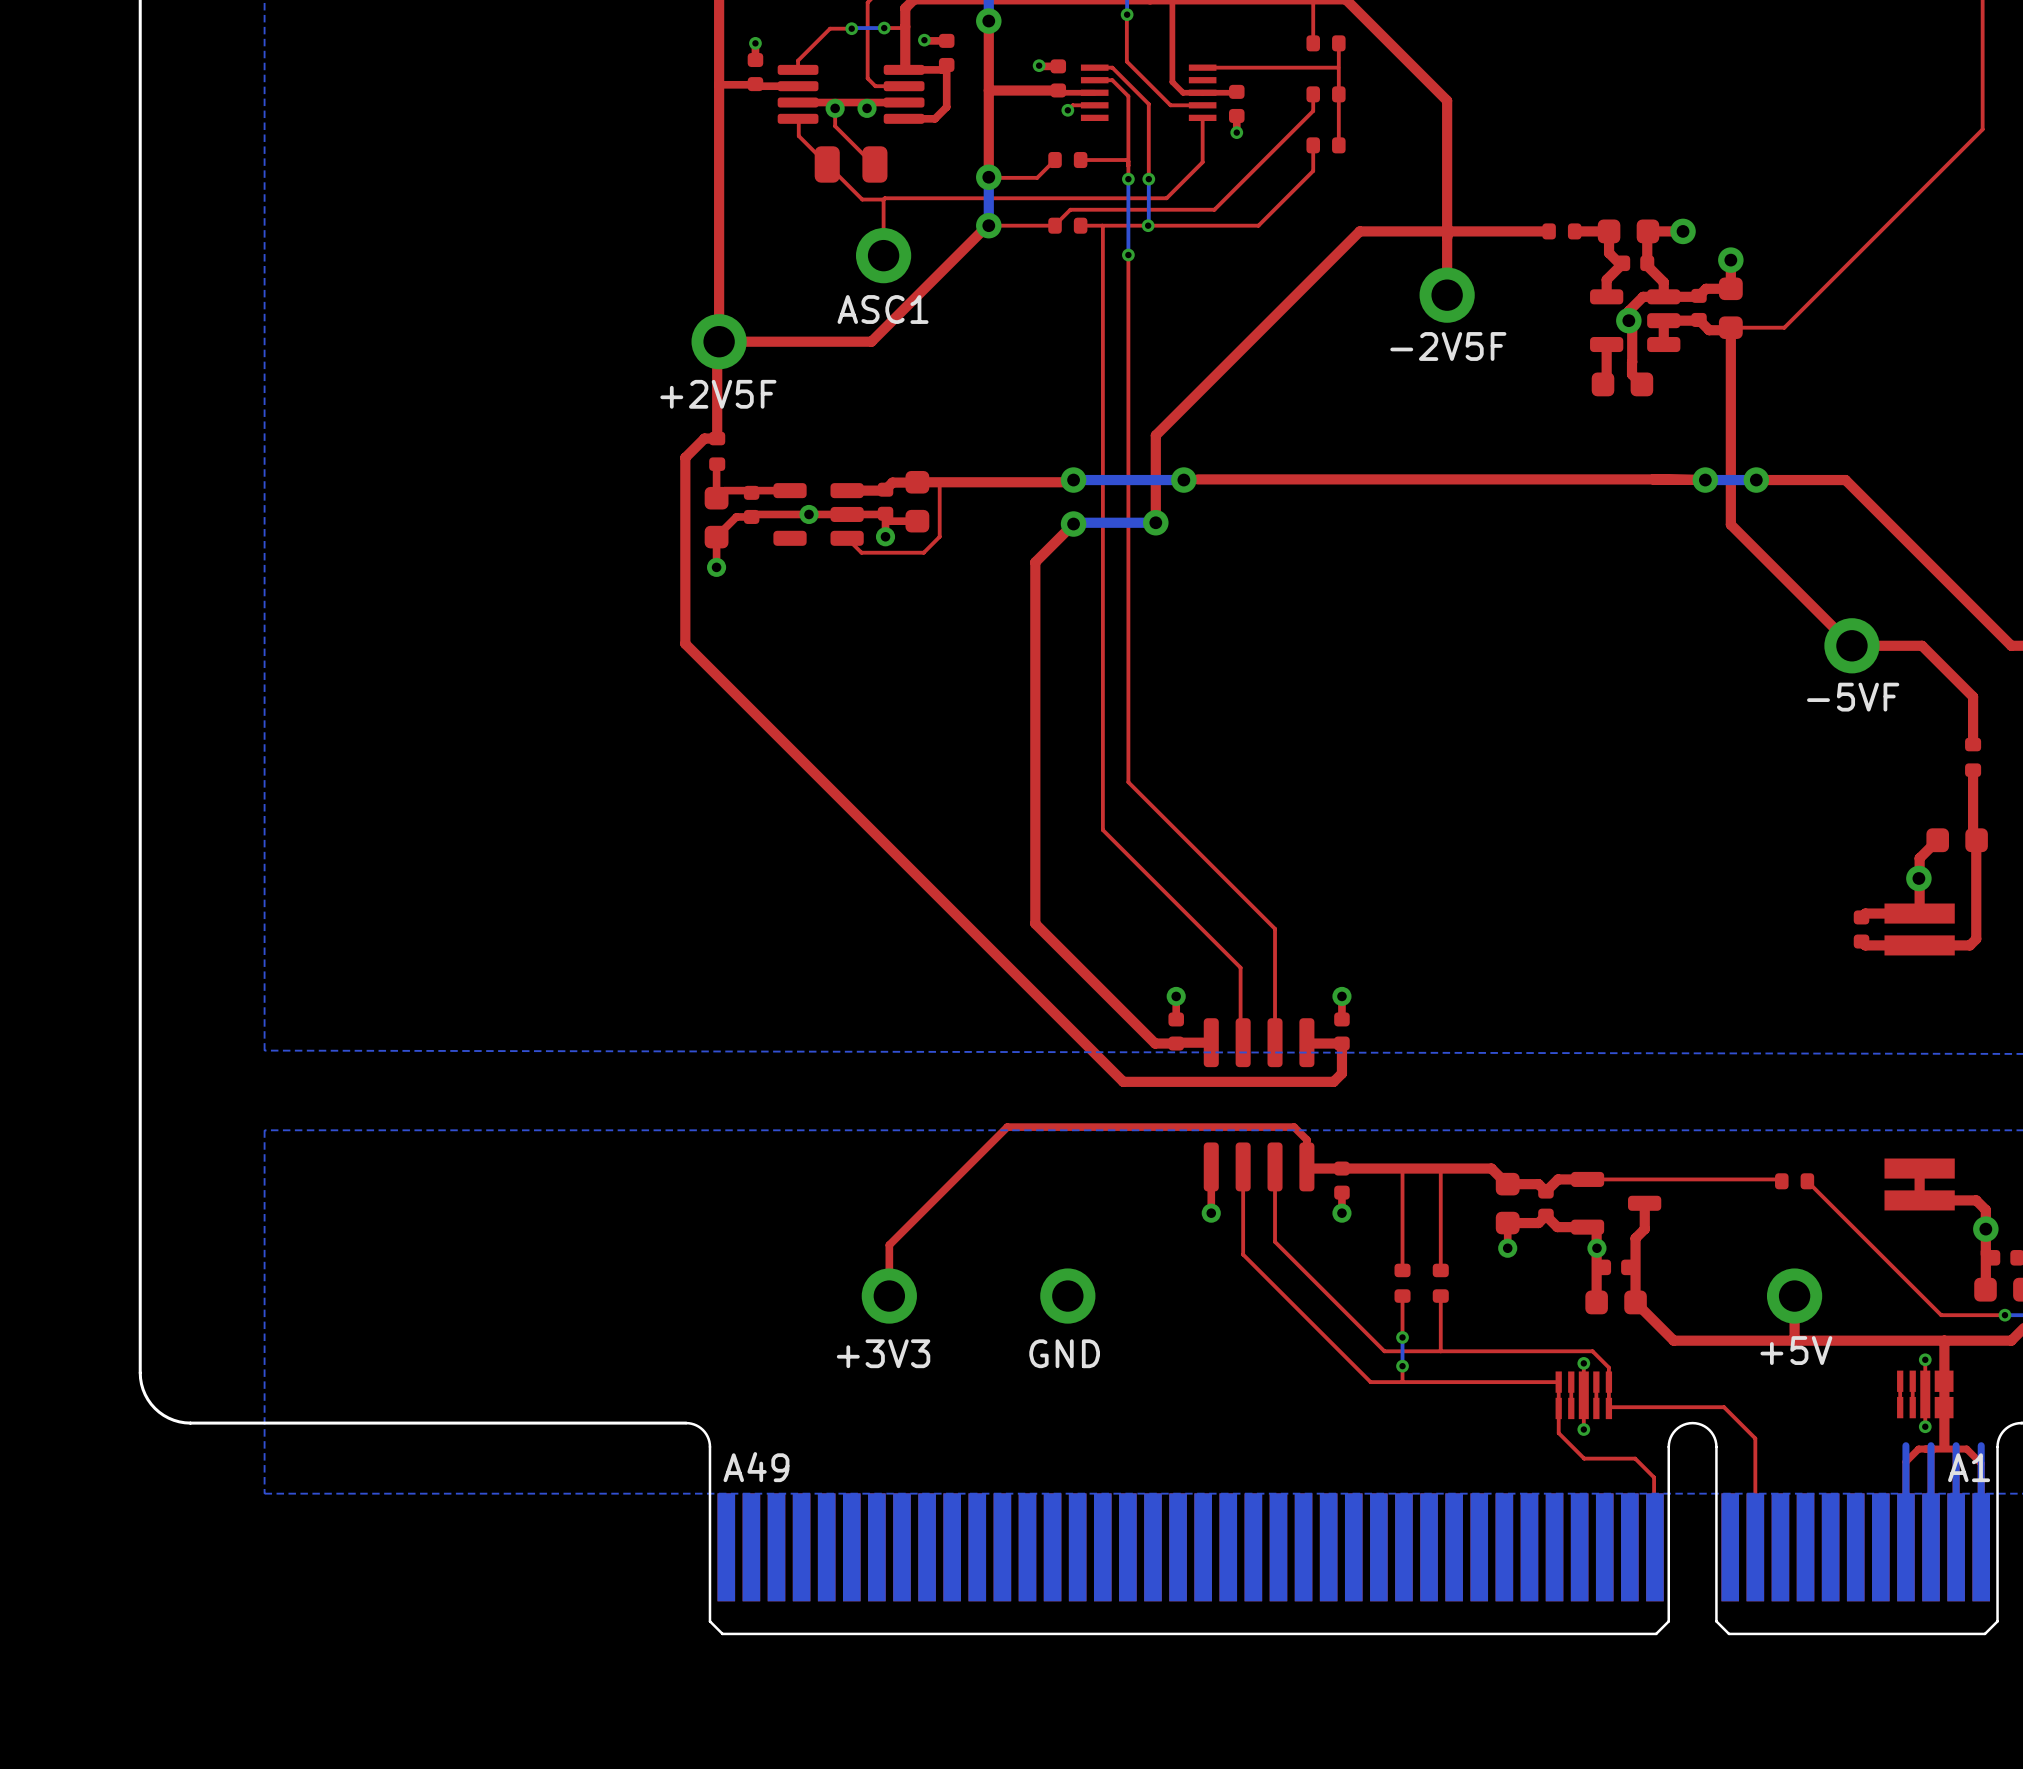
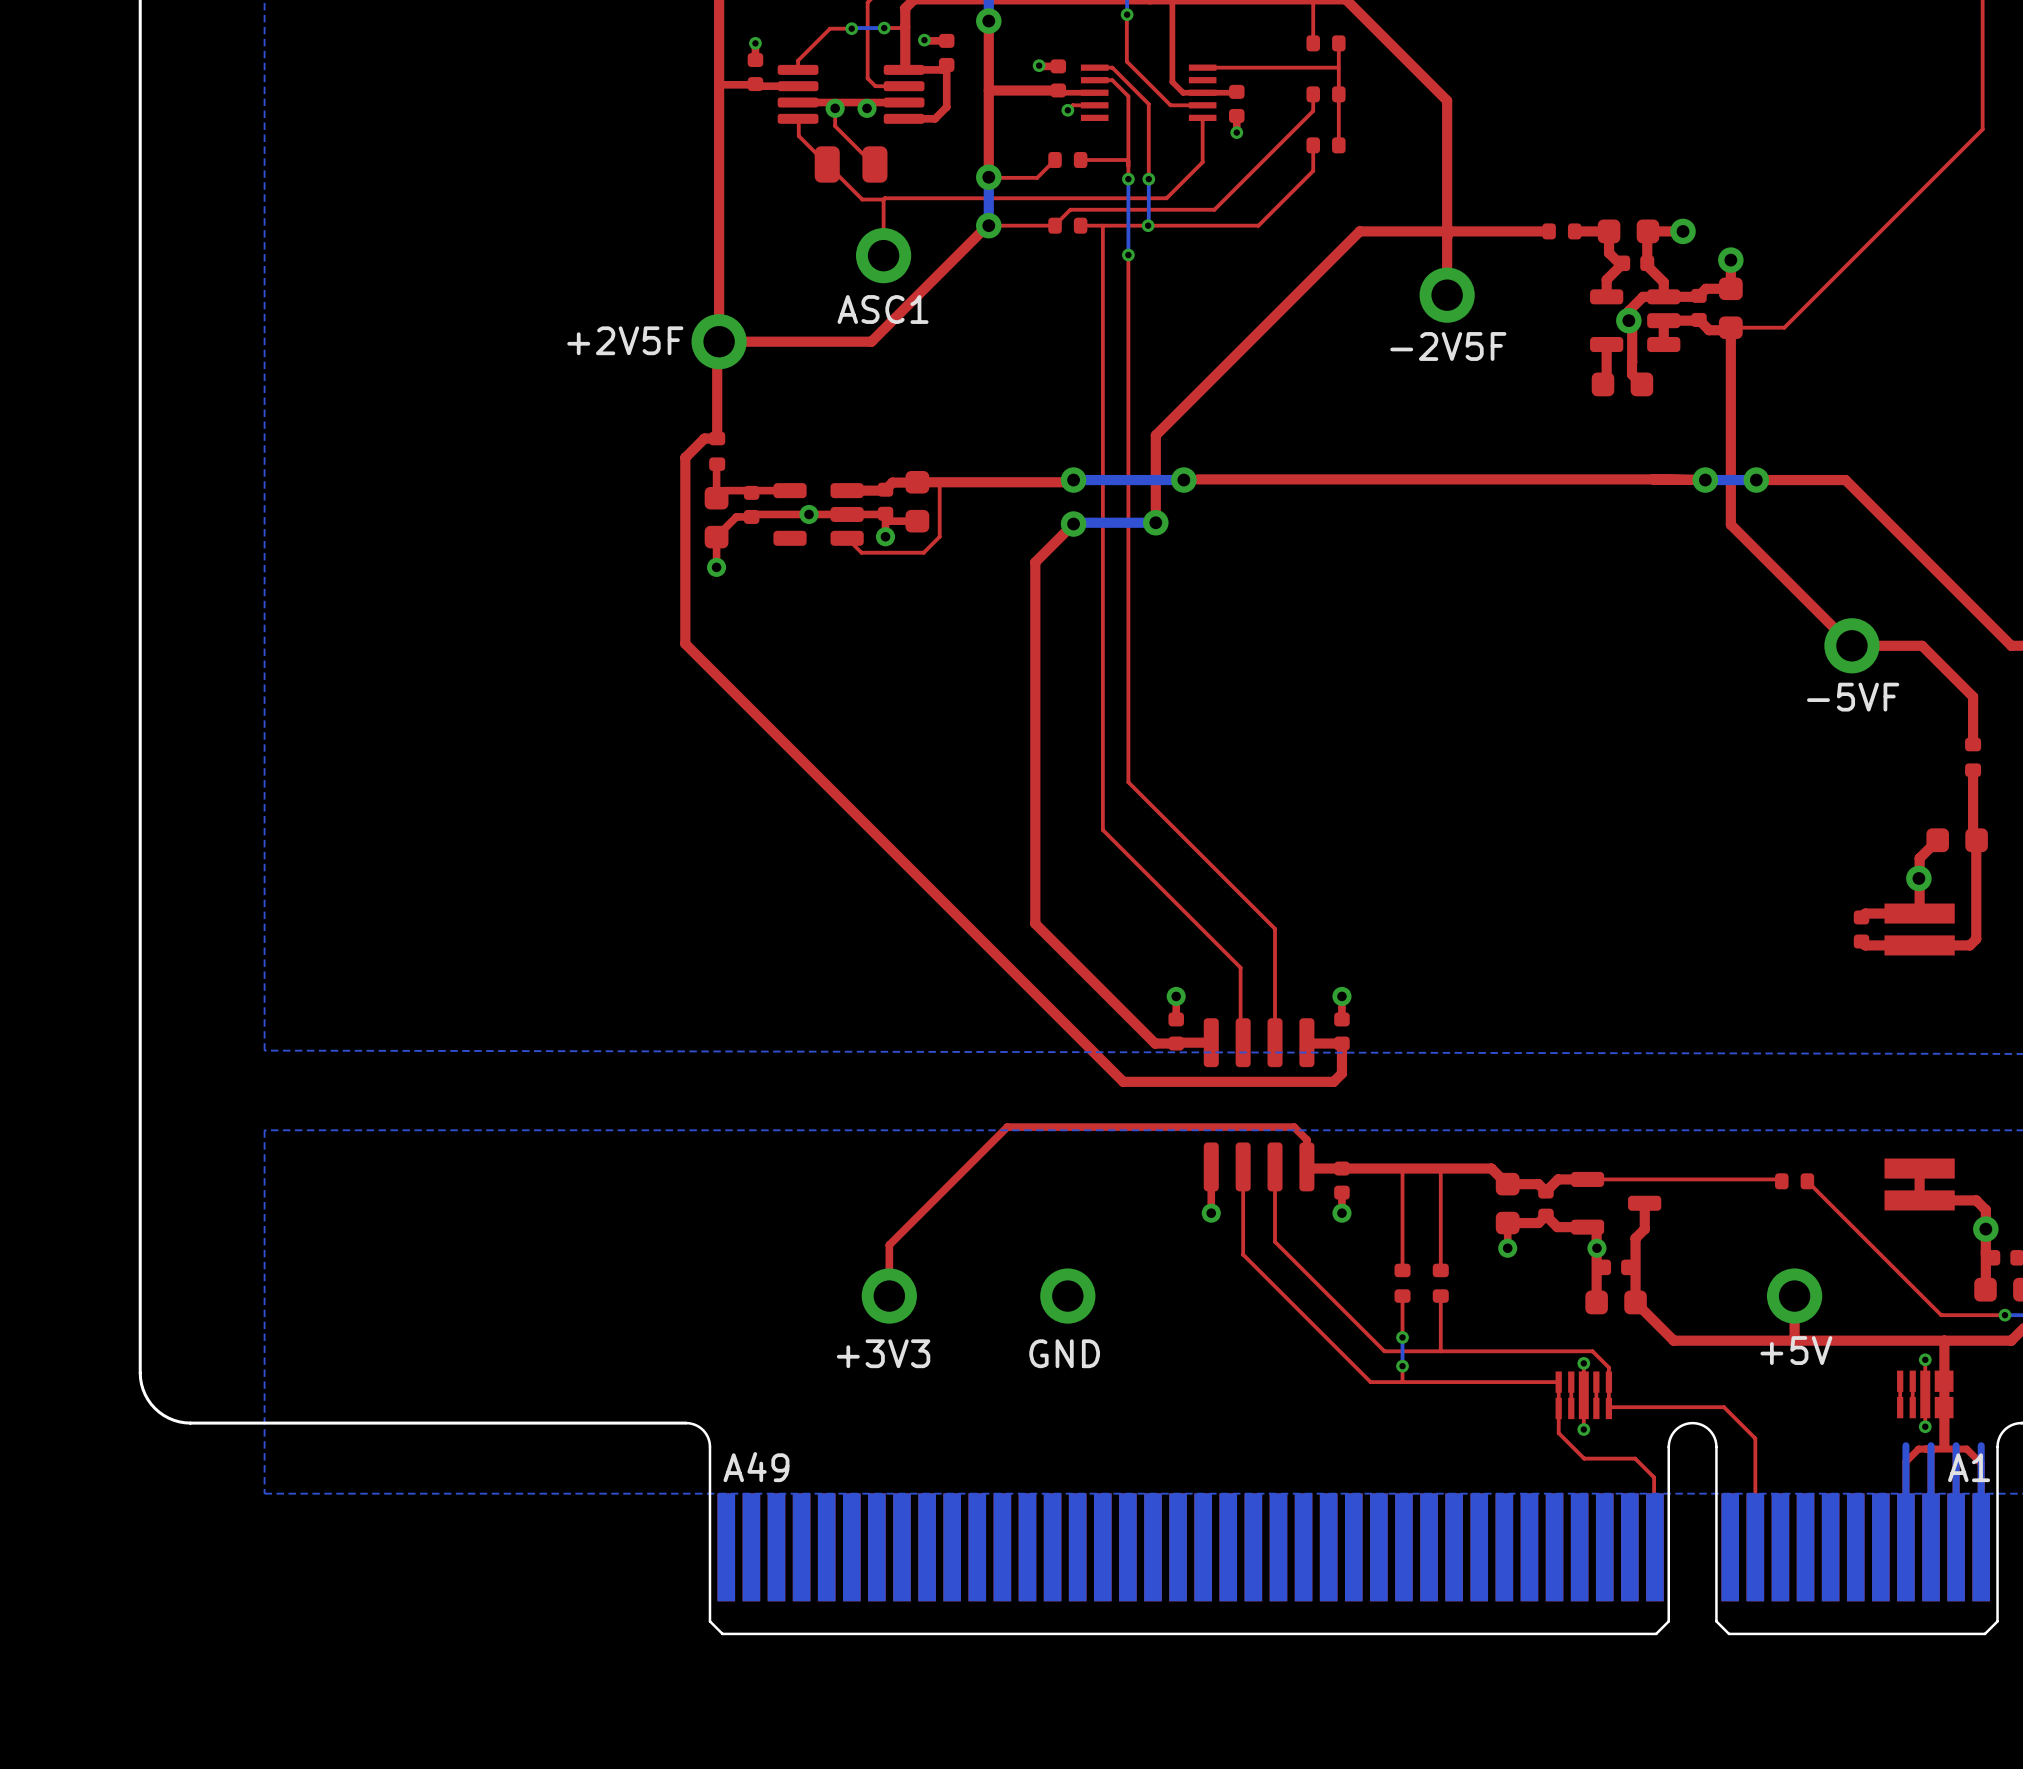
text position: +2V5F (718, 394) -> +2V5F (625, 340)

